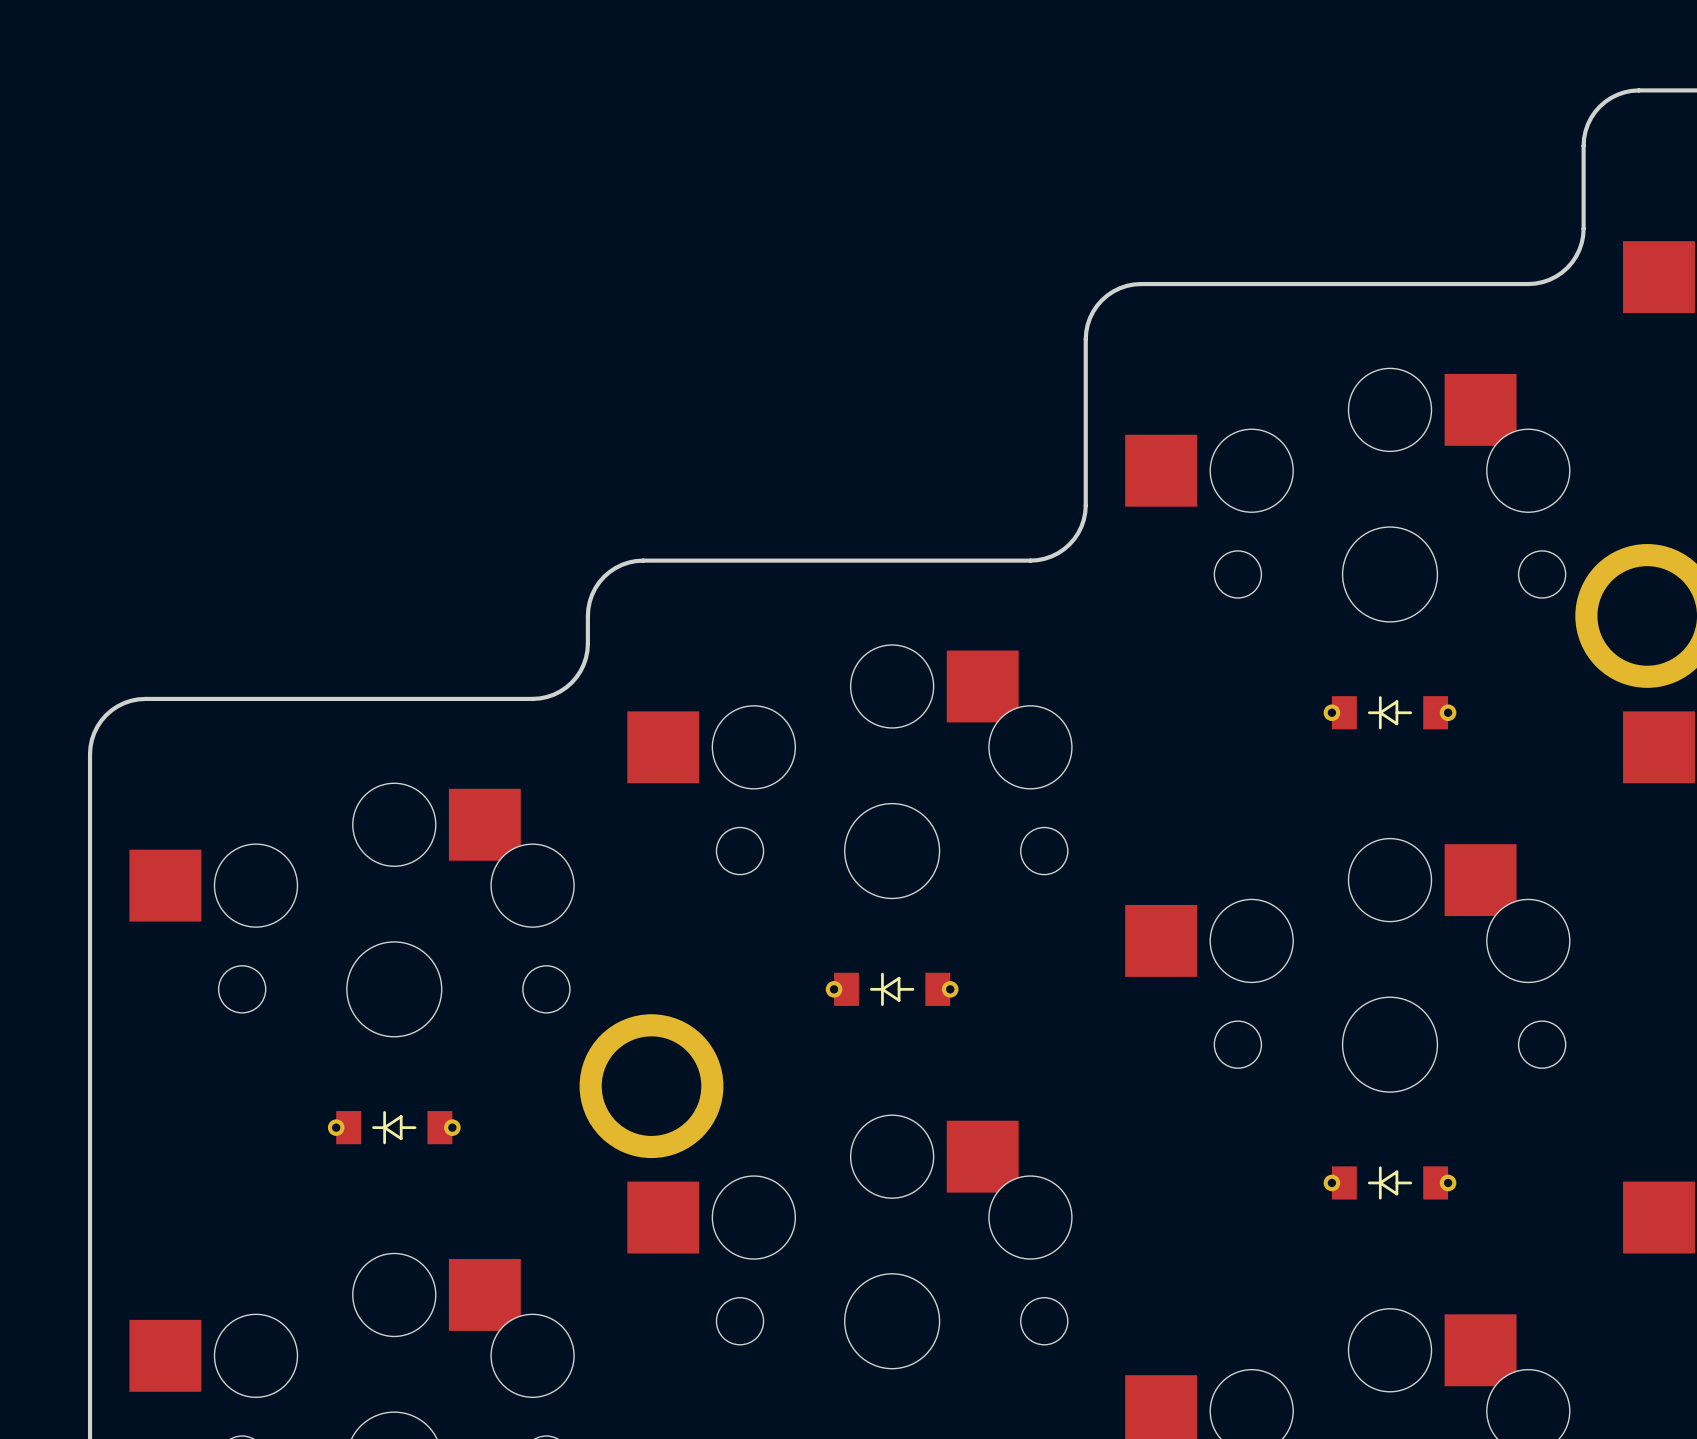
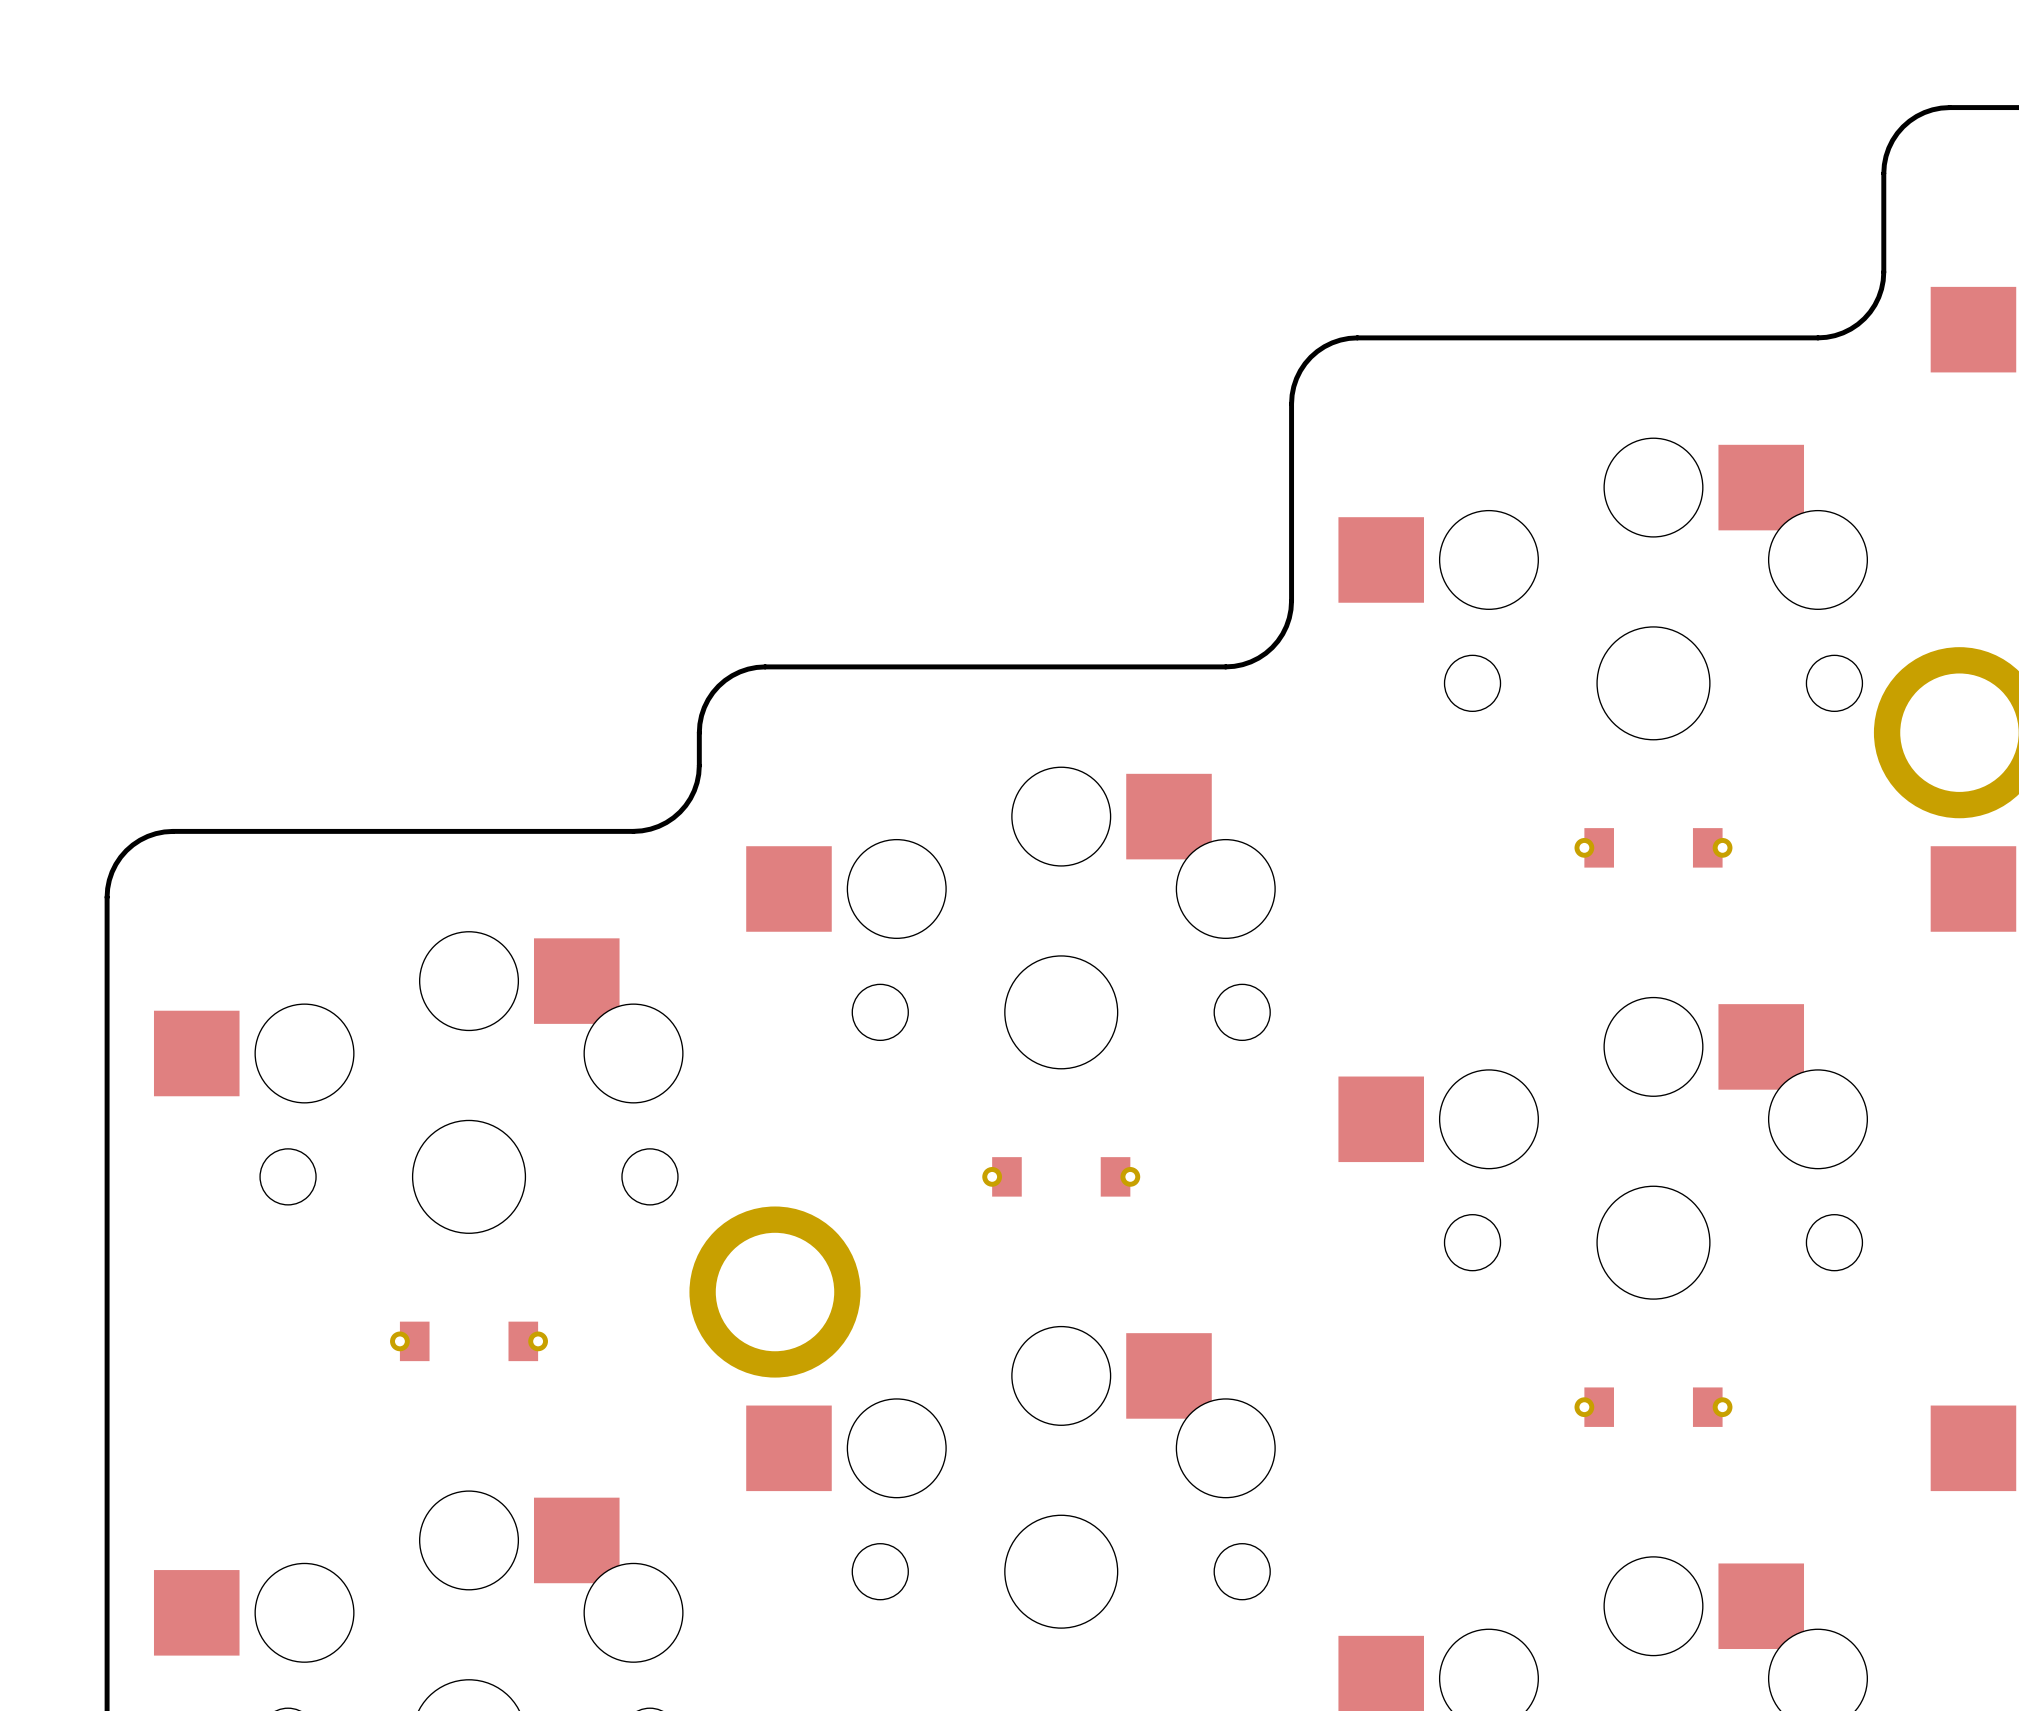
part footprint: [1323, 696, 1457, 730] -> [1574, 828, 1733, 868]
part footprint: [825, 972, 959, 1006] -> [982, 1157, 1141, 1197]
part footprint: [327, 1111, 461, 1145] -> [390, 1321, 548, 1362]
part footprint: [1323, 1166, 1457, 1200] -> [1574, 1387, 1733, 1427]

